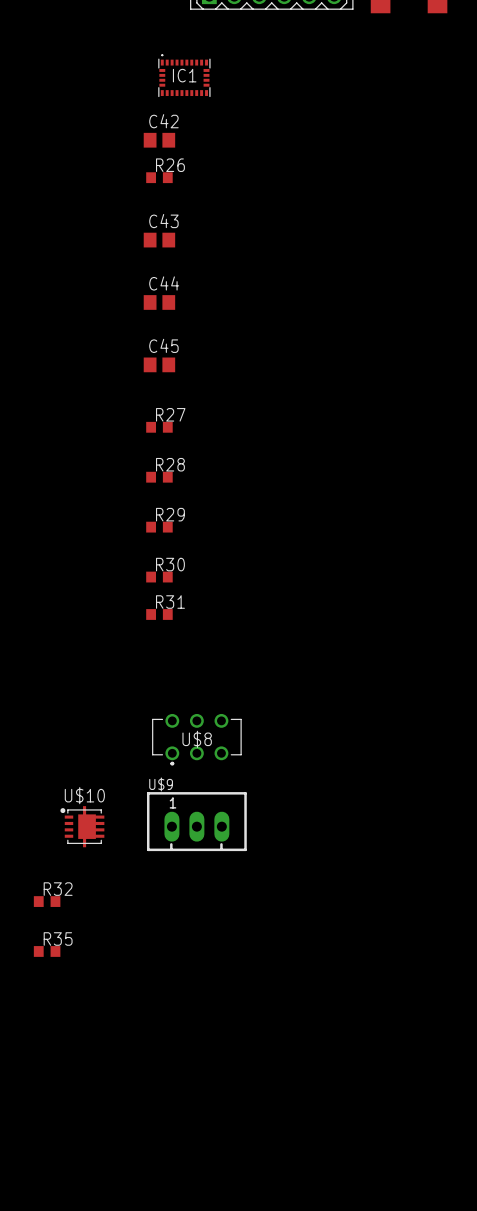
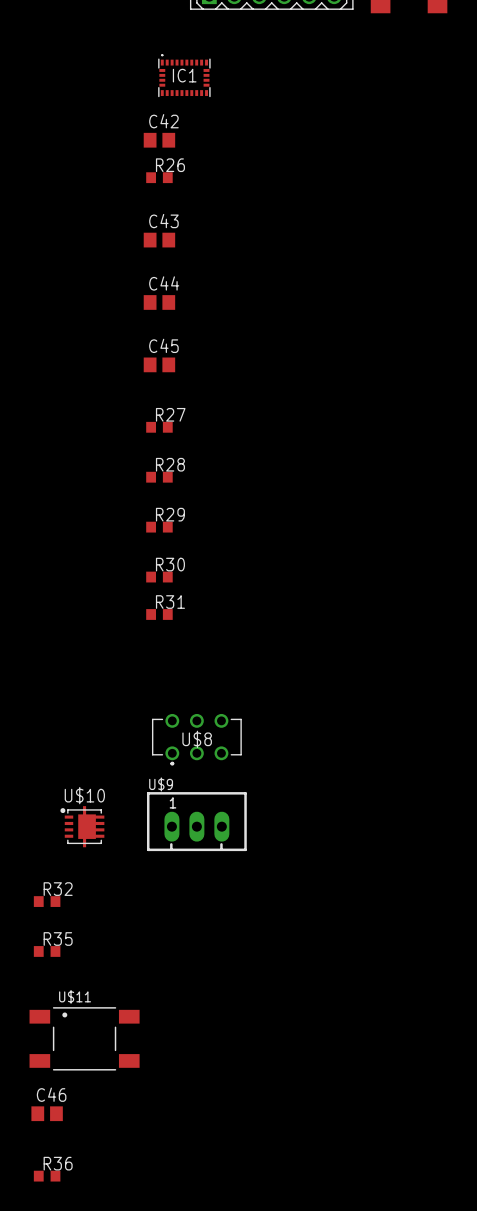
U$11: none -> (84, 1038)
C46: none -> (47, 1113)
R36: none -> (47, 1176)

